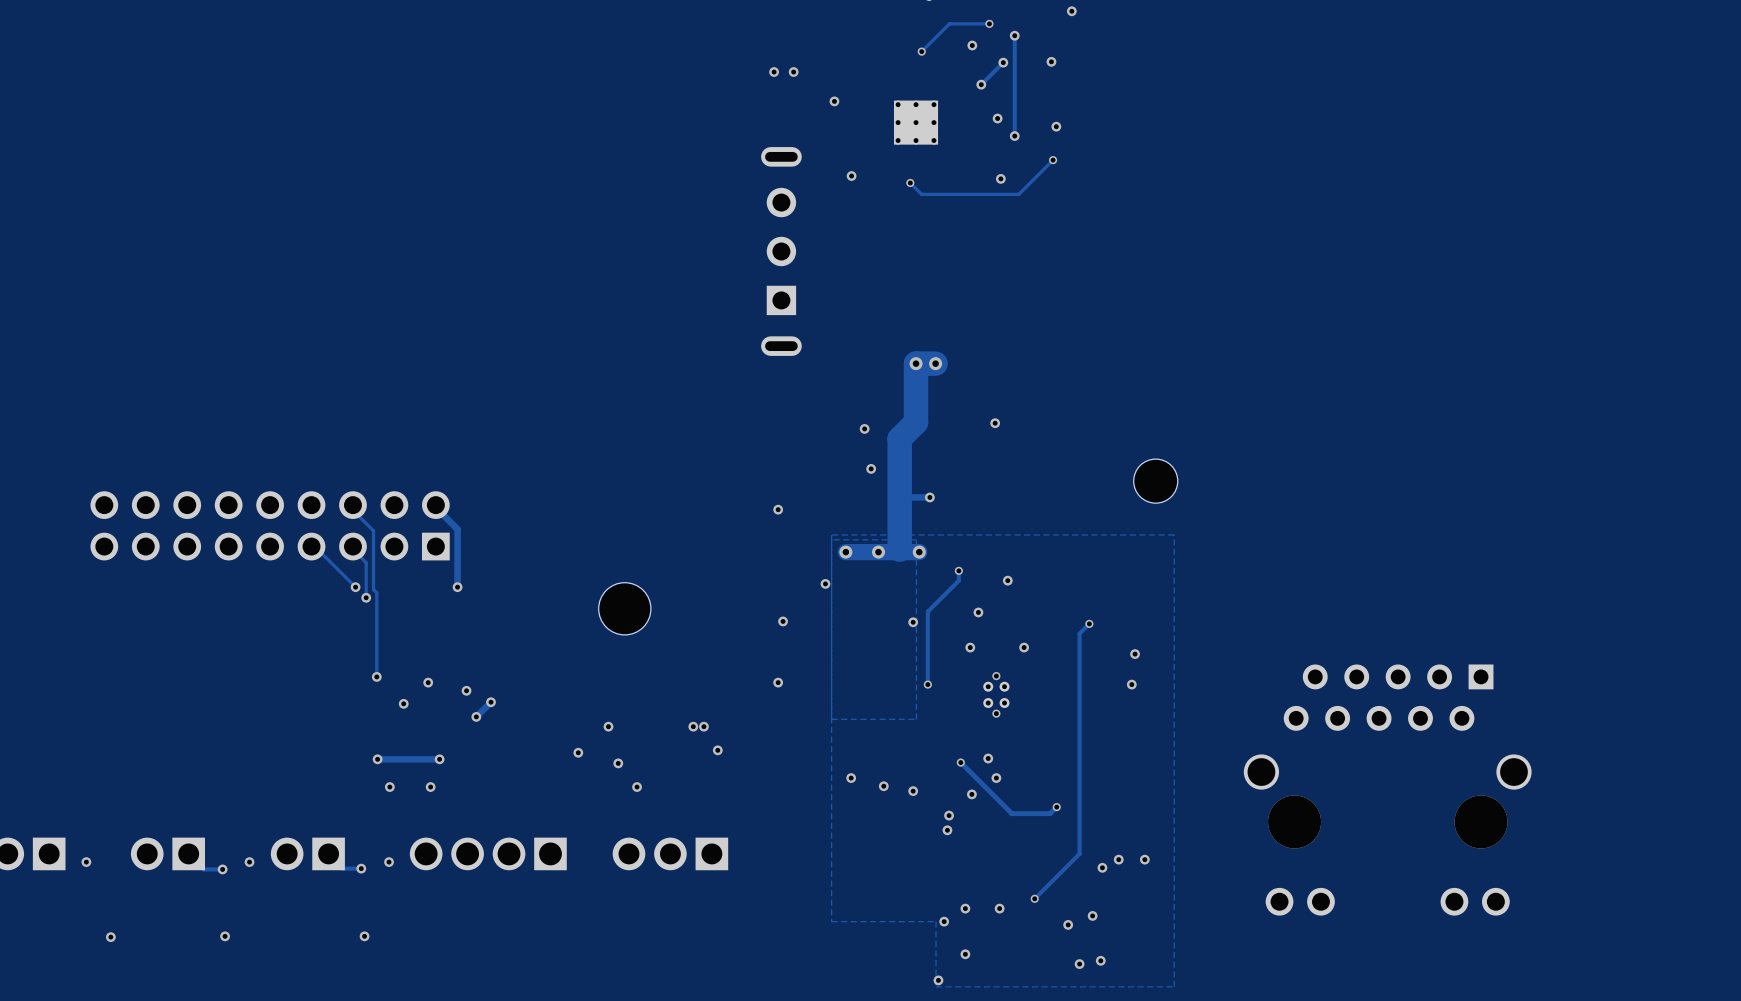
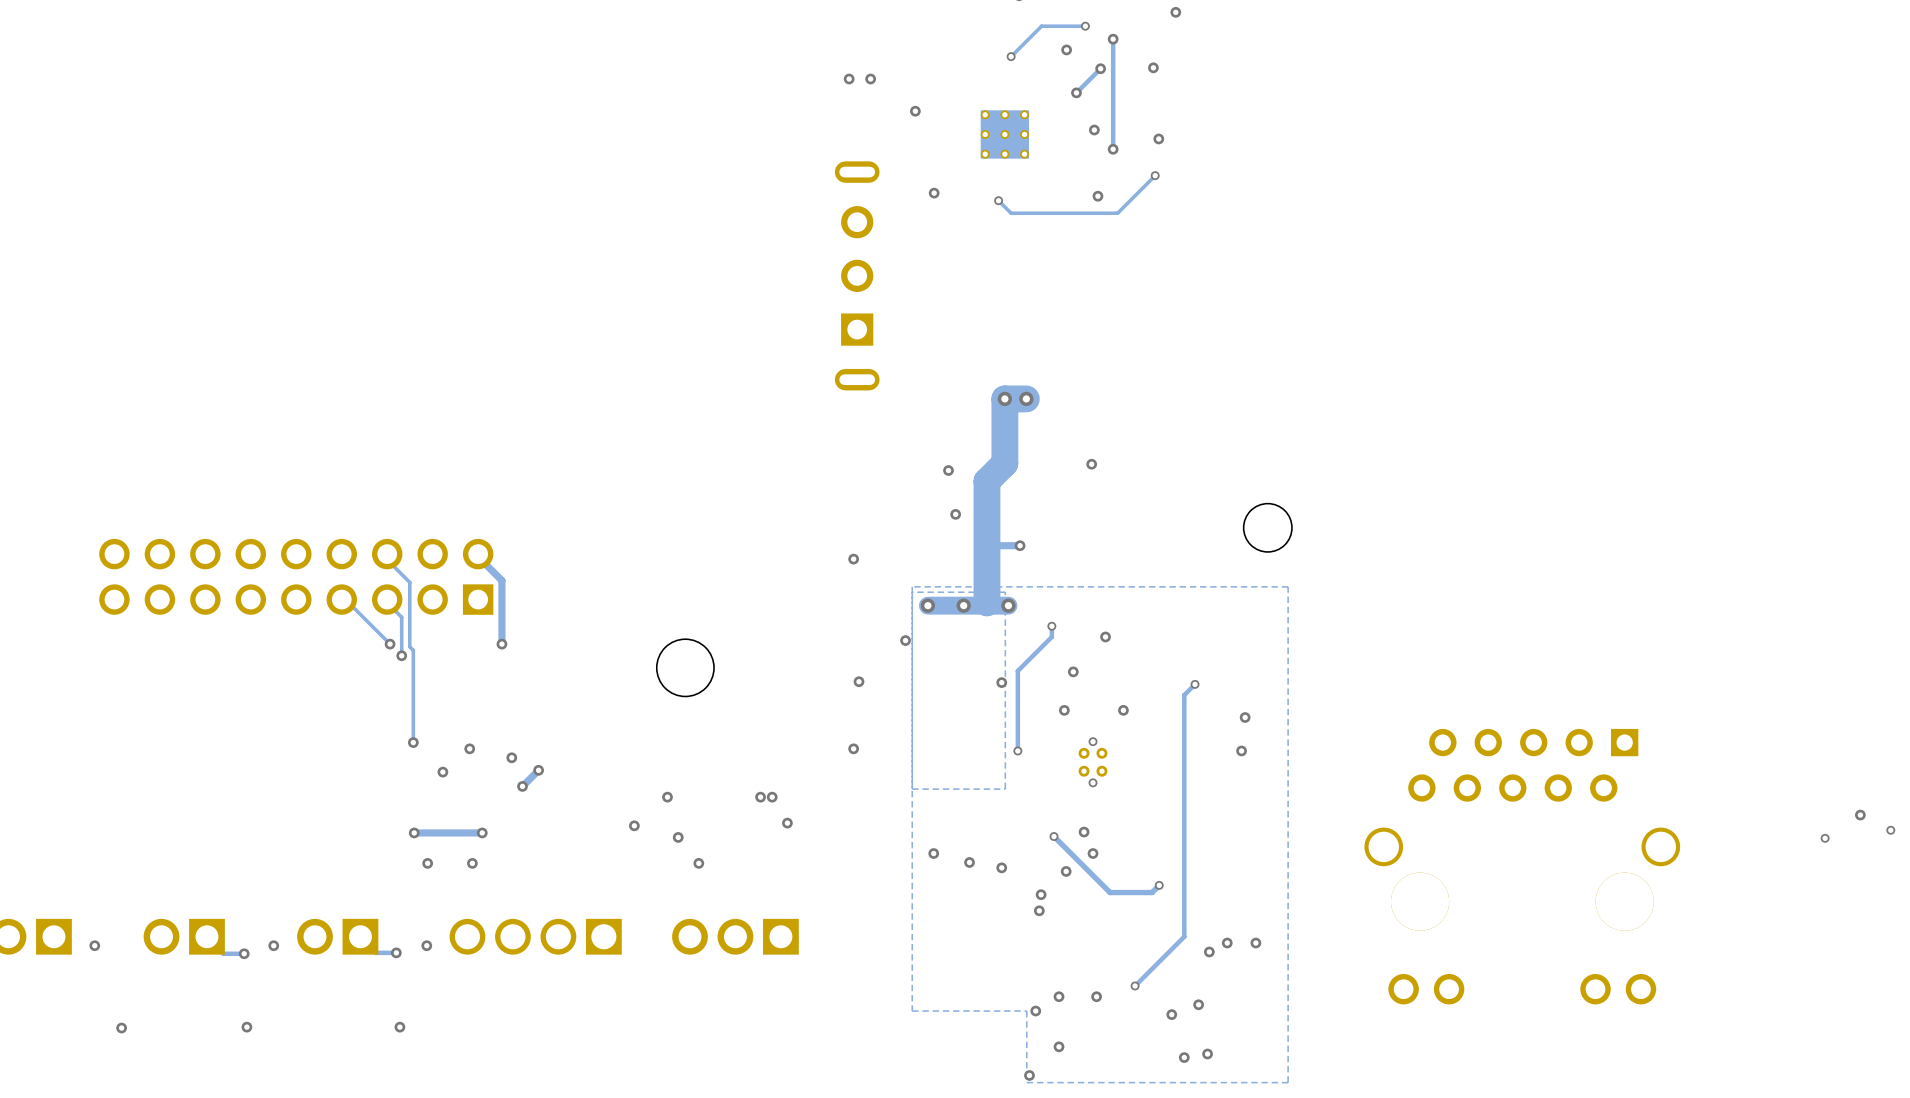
via: none -> (1860, 815)
via: none -> (1890, 830)
via: none -> (1825, 838)

